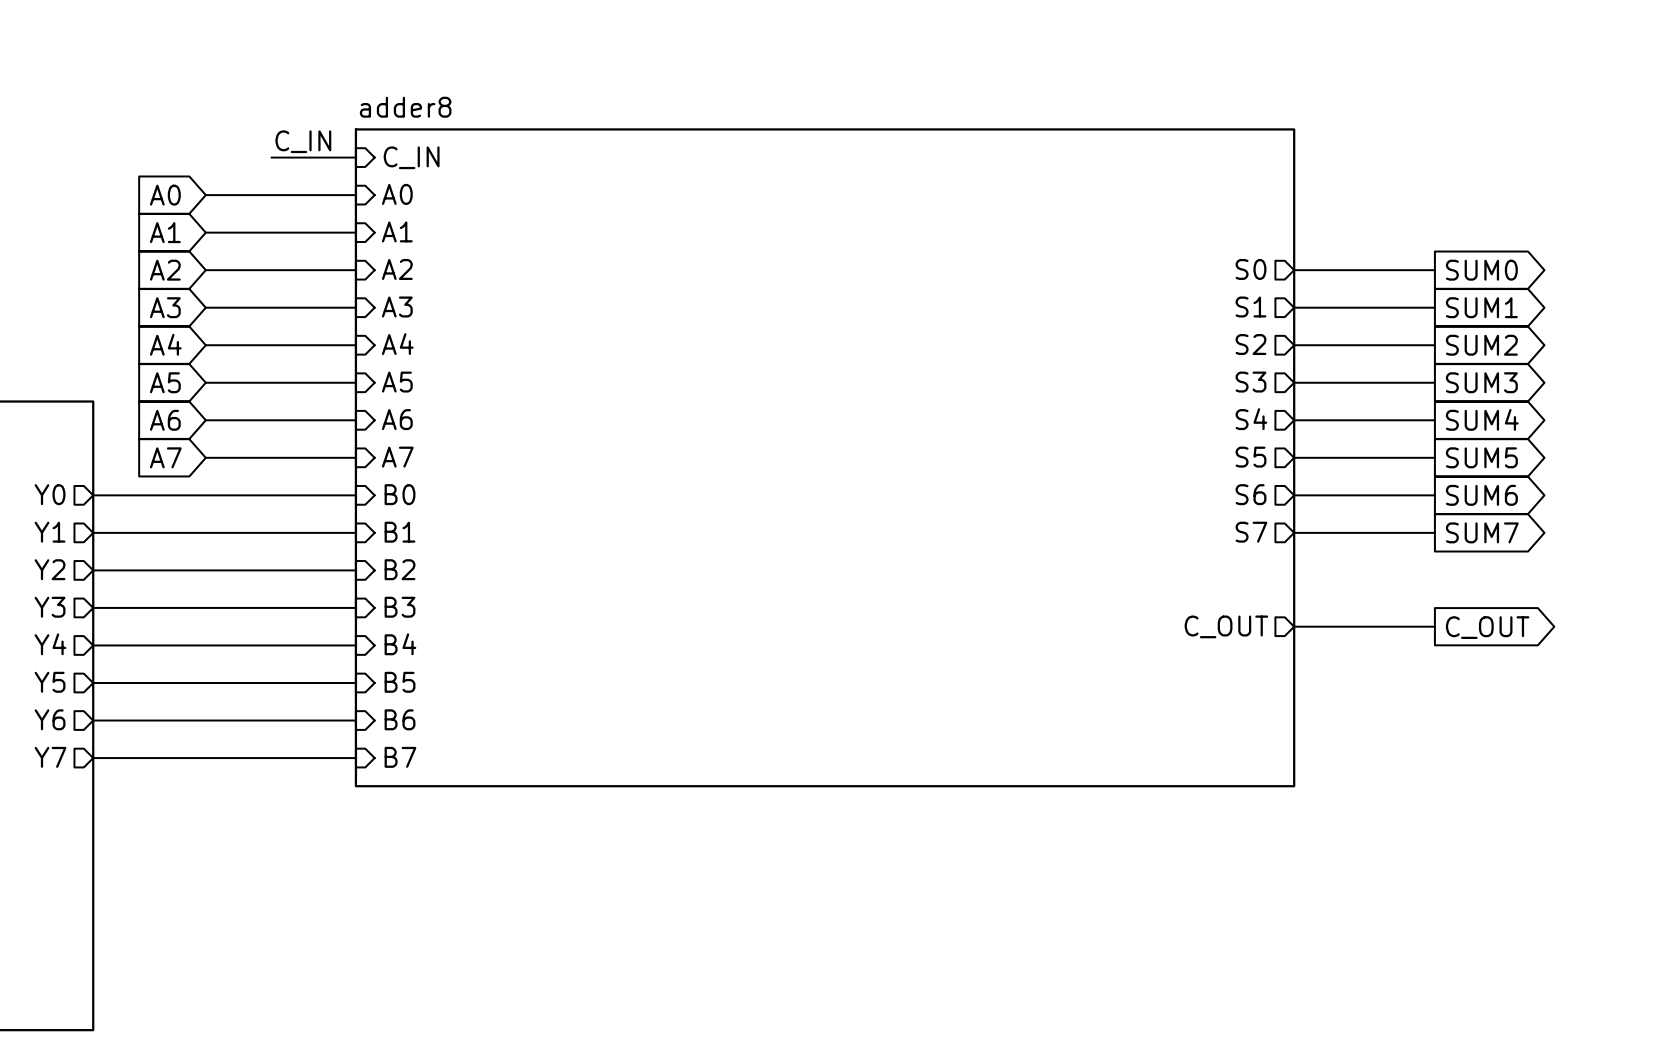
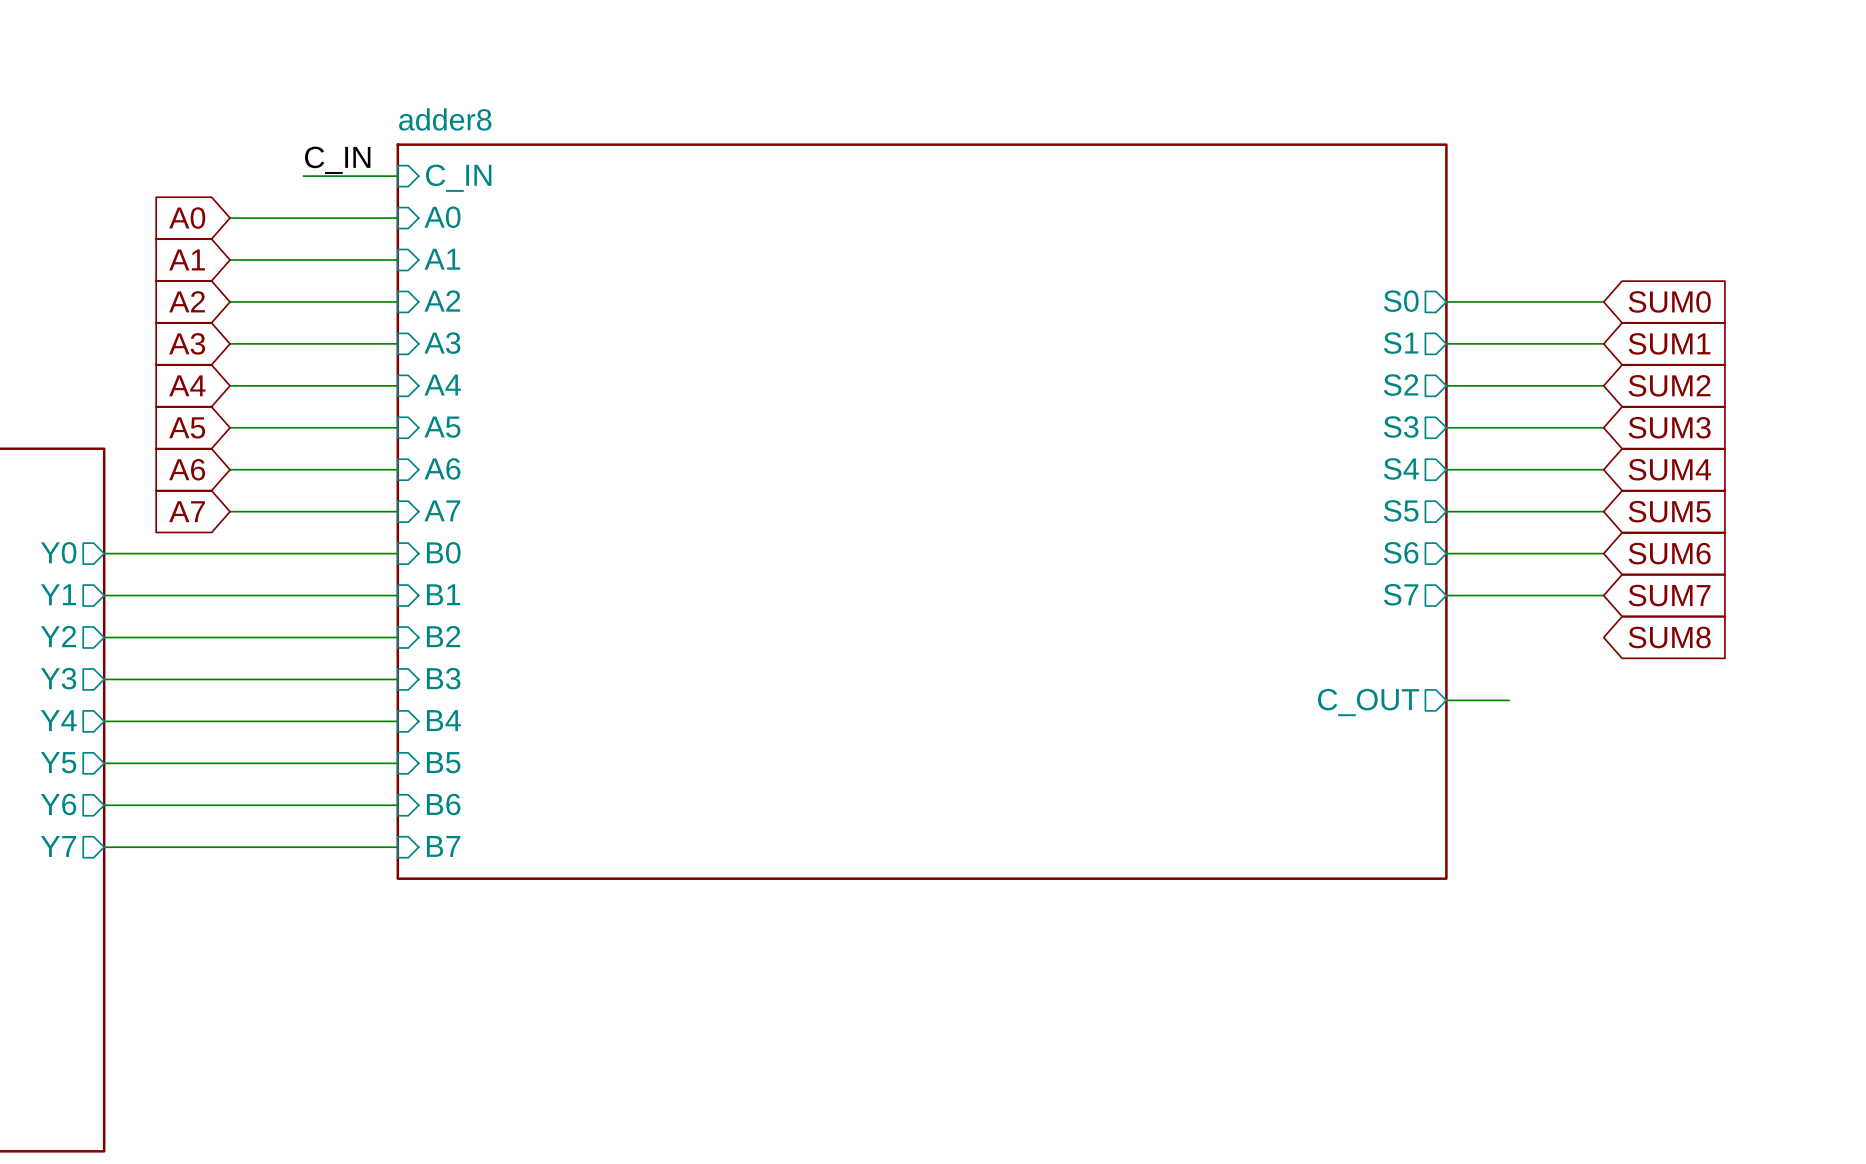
global label shape: output (1481, 270) -> input (1669, 301)
global label shape: output (1481, 307) -> input (1669, 343)
global label shape: output (1481, 345) -> input (1669, 385)
global label shape: output (1481, 382) -> input (1669, 427)
global label shape: output (1482, 419) -> input (1669, 469)
global label shape: output (1481, 457) -> input (1669, 511)
global label shape: output (1481, 495) -> input (1669, 553)
global label shape: output (1482, 532) -> input (1669, 595)
global label: none -> SUM8 (1669, 637)
wire: (1350, 626) (1434, 626) -> none
global label: C_OUT (1487, 627) -> none

